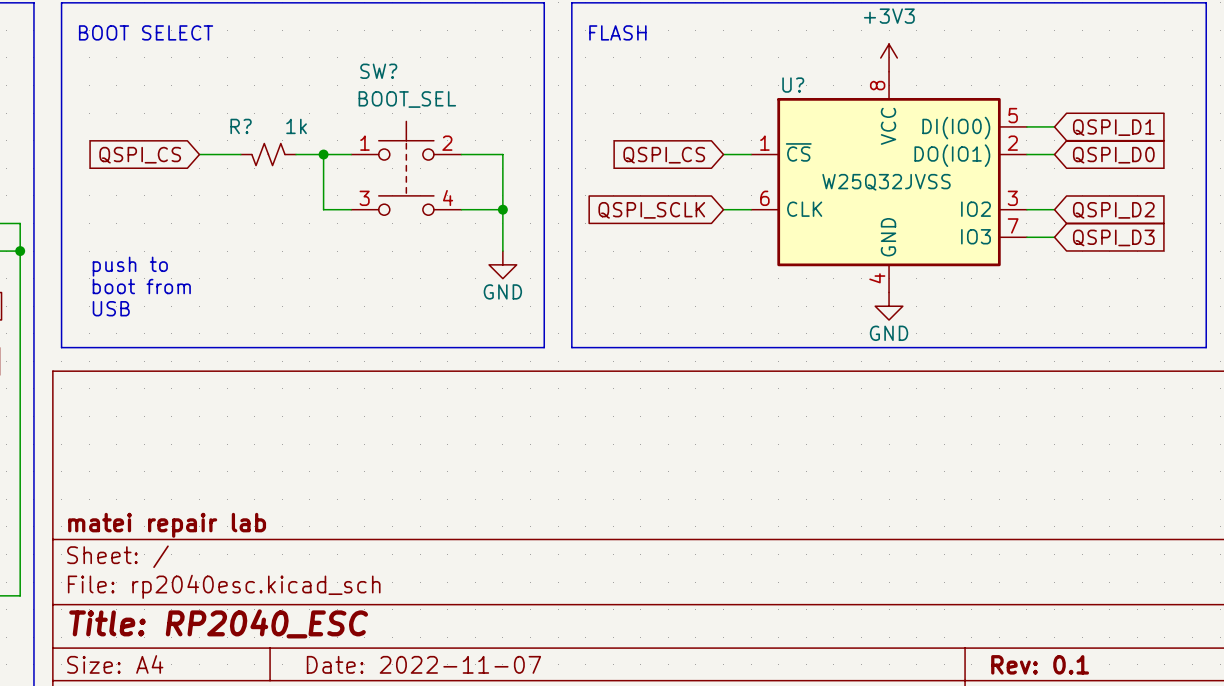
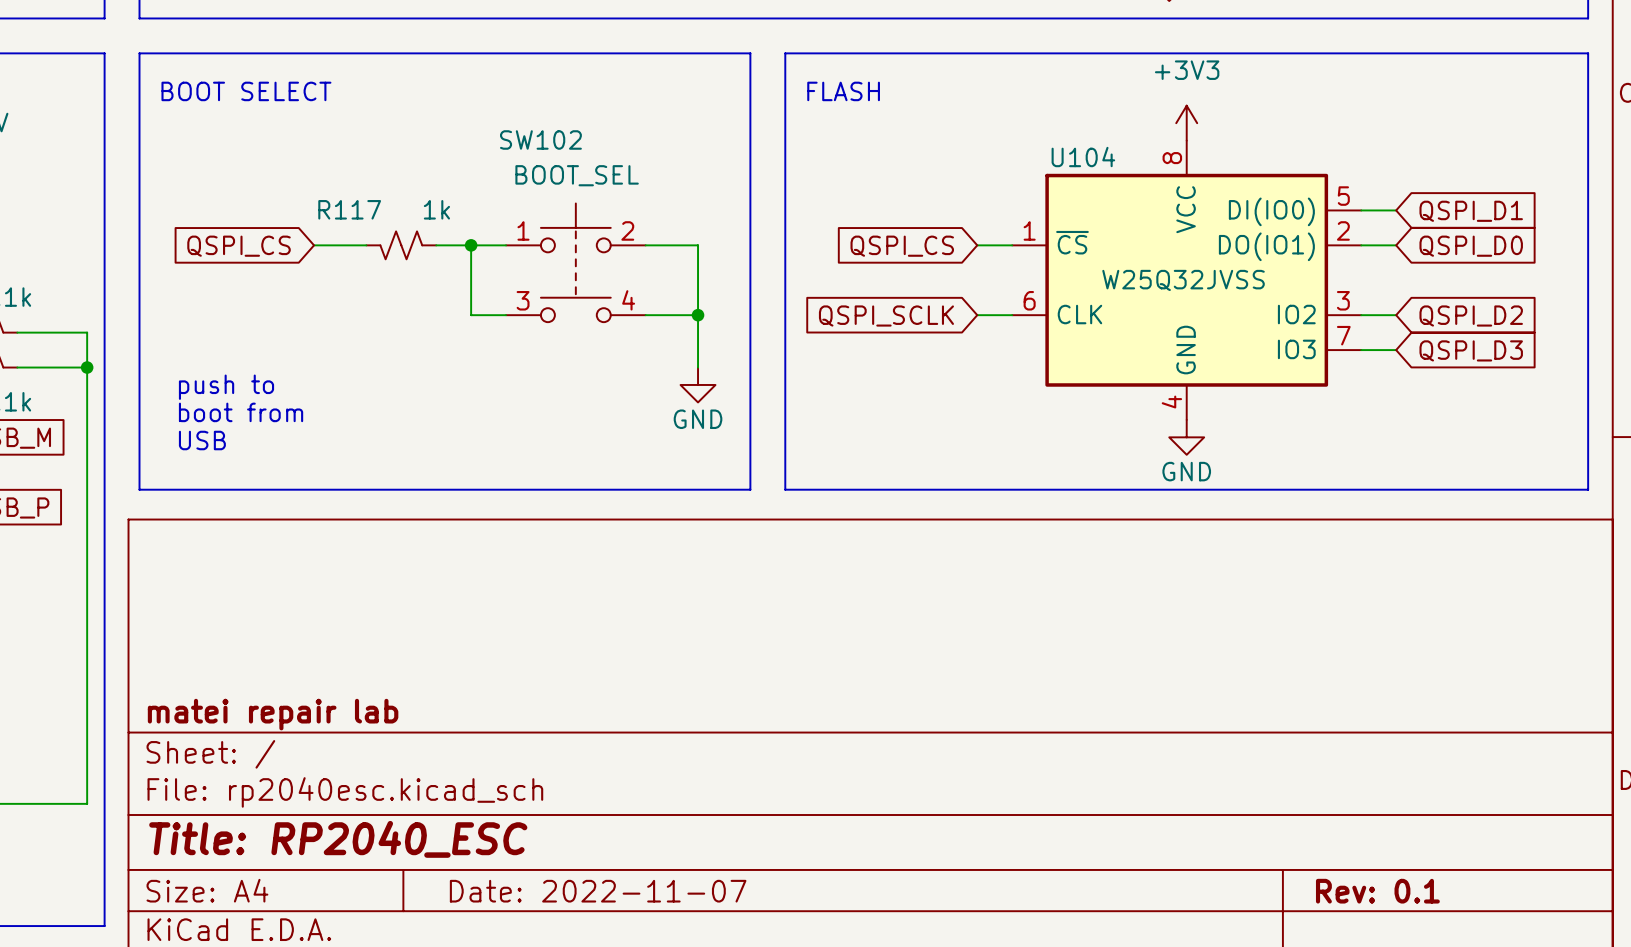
SW? name: SW? (378, 71) -> SW102 (540, 139)
U? name: U? (793, 85) -> U104 (1083, 157)
R? name: R? (241, 126) -> R117 (349, 209)

